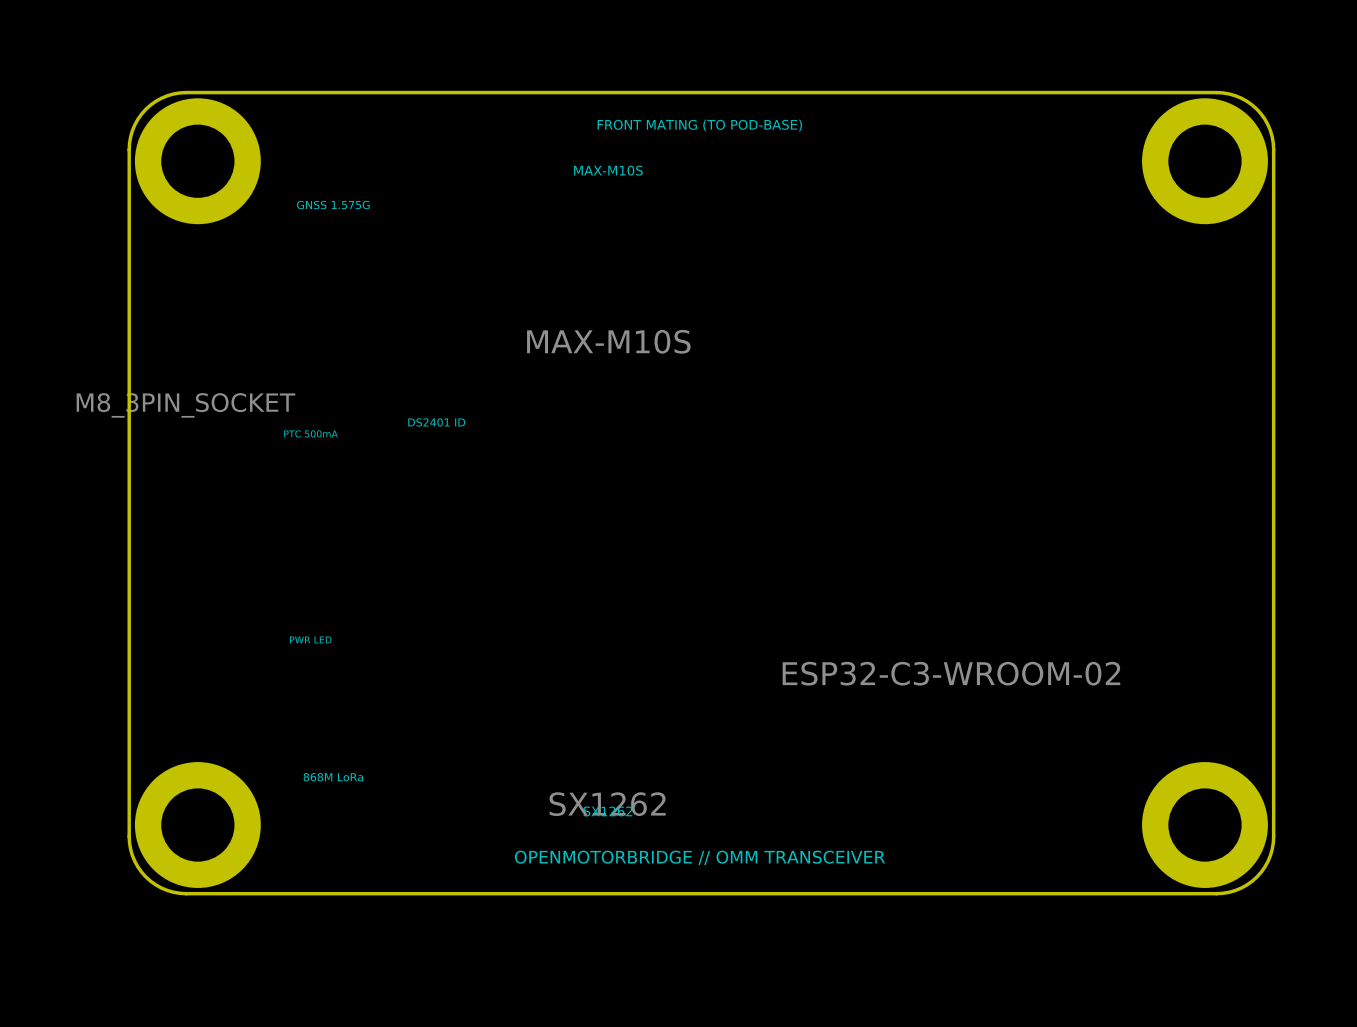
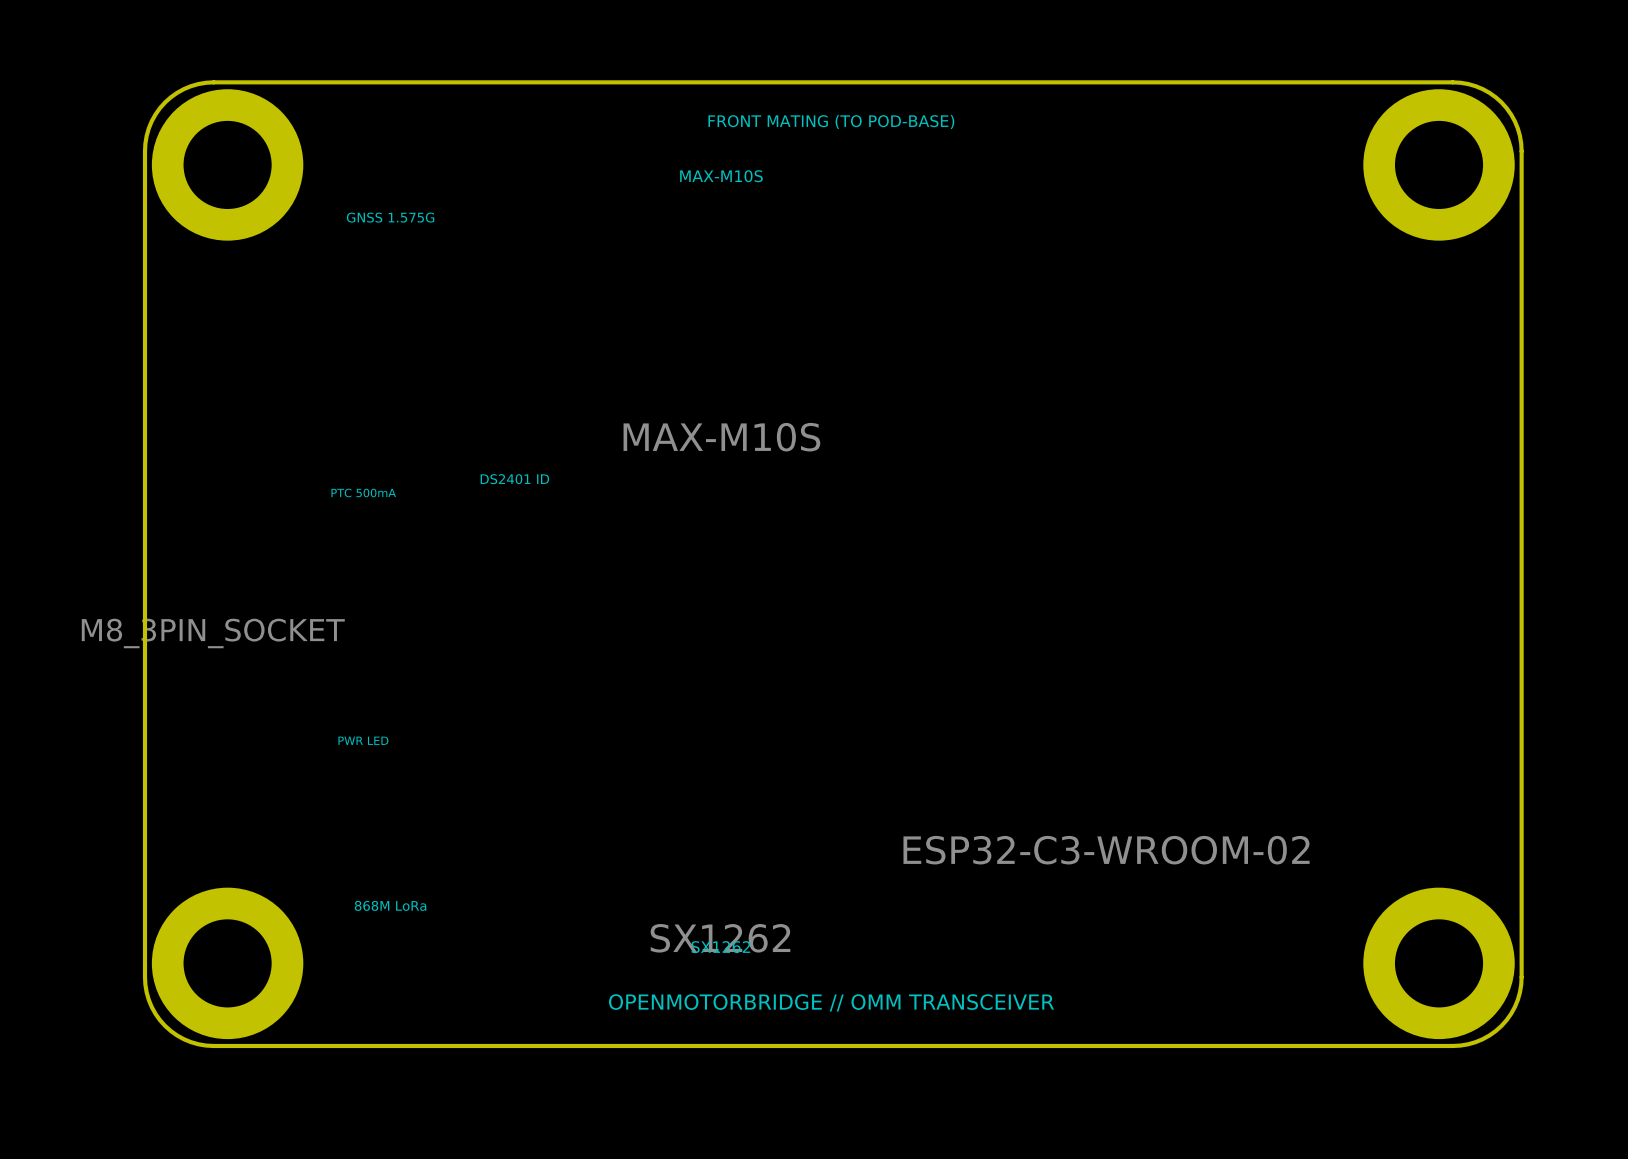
drawing position: (608, 341) -> (721, 437)
drawing position: (185, 405) -> (213, 633)
drawing position: (951, 673) -> (1106, 850)

